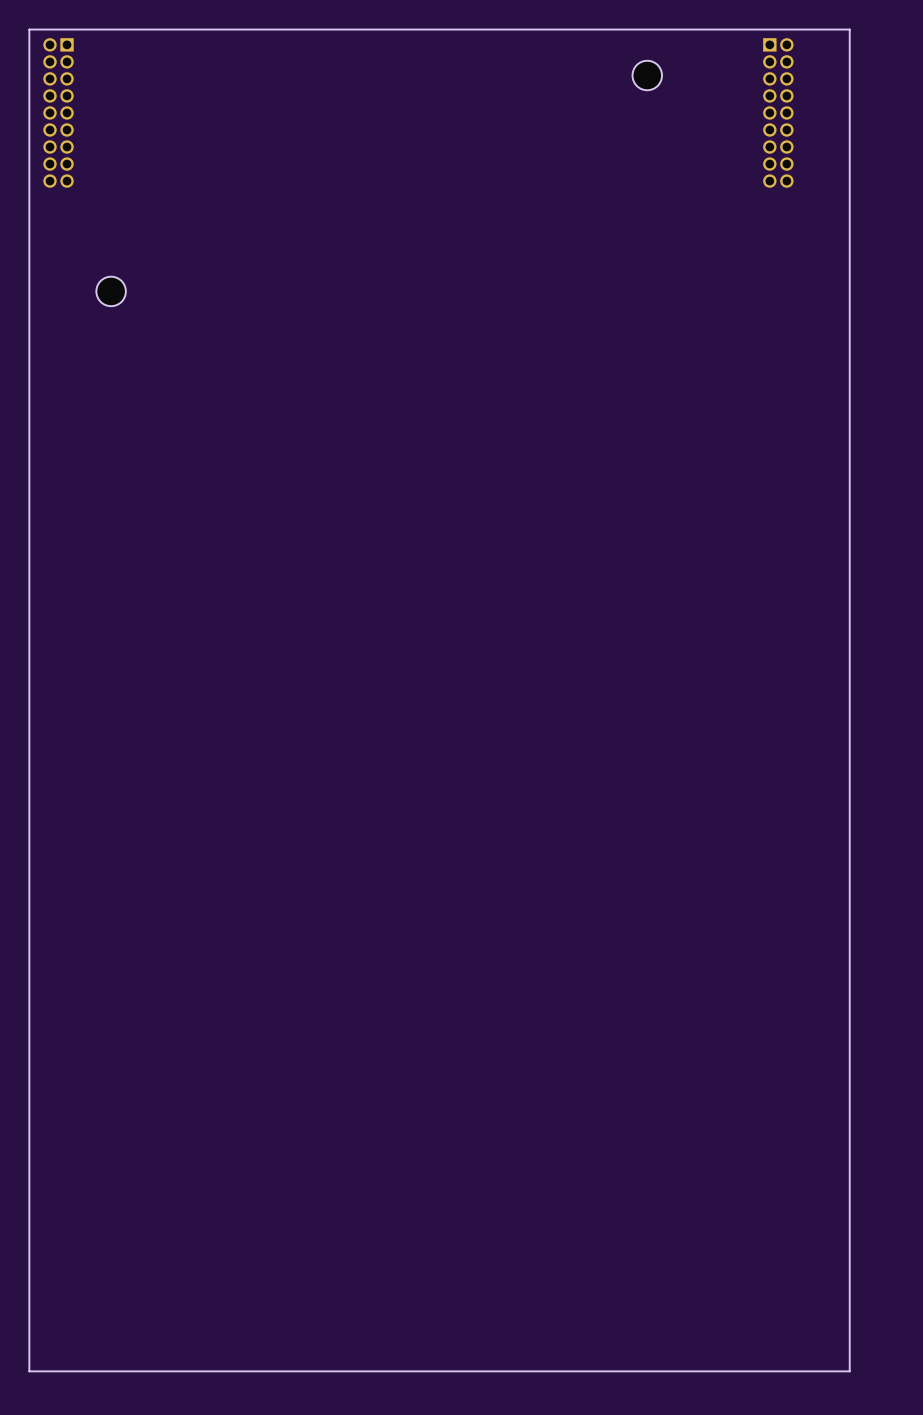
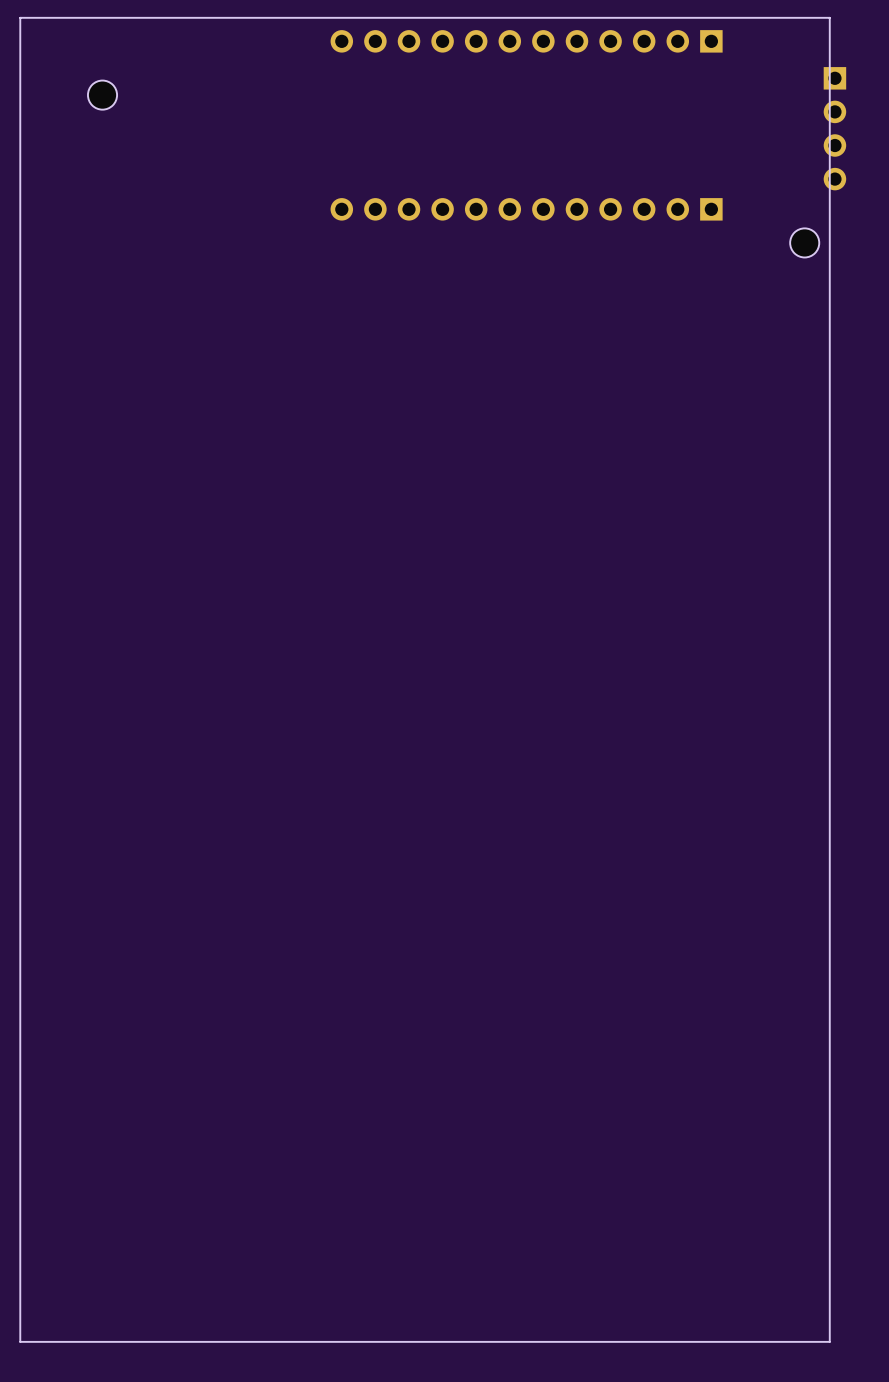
part: none -> (526, 41)
part position: (647, 75) -> (804, 242)
part: (58, 112) -> none
part: (778, 112) -> none
part: none -> (834, 128)
part: none -> (526, 209)
part position: (111, 291) -> (102, 95)

